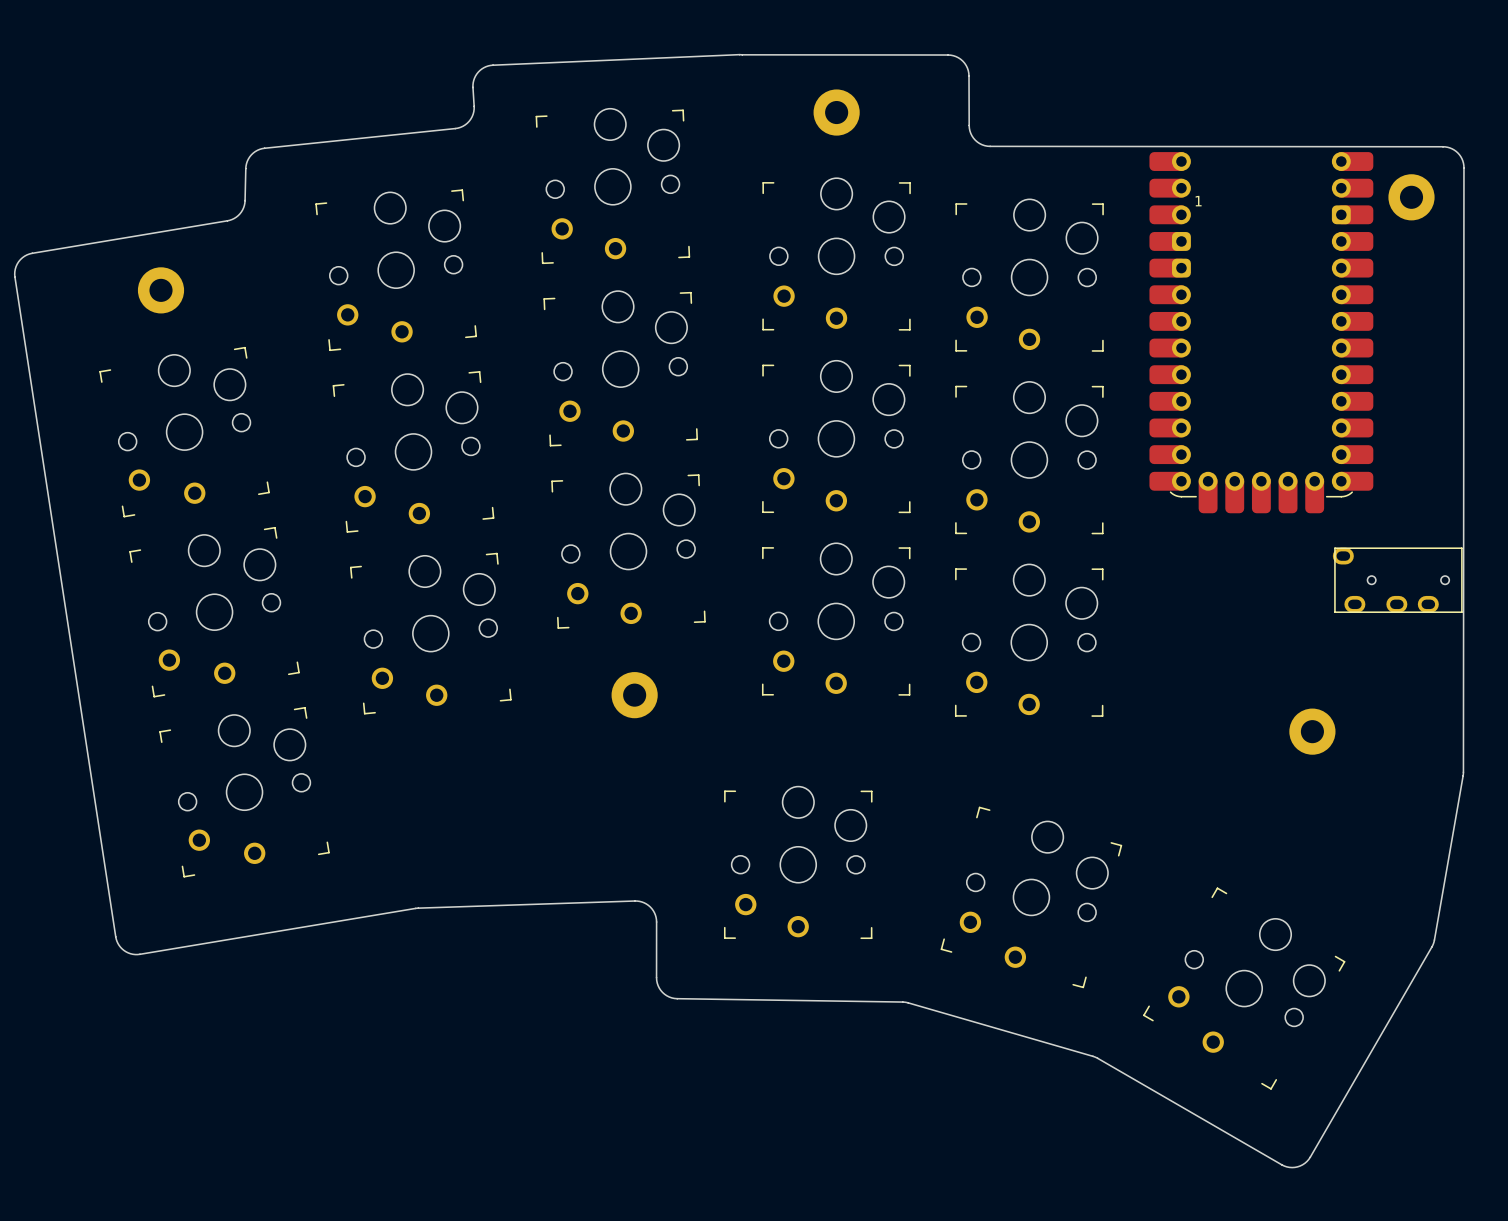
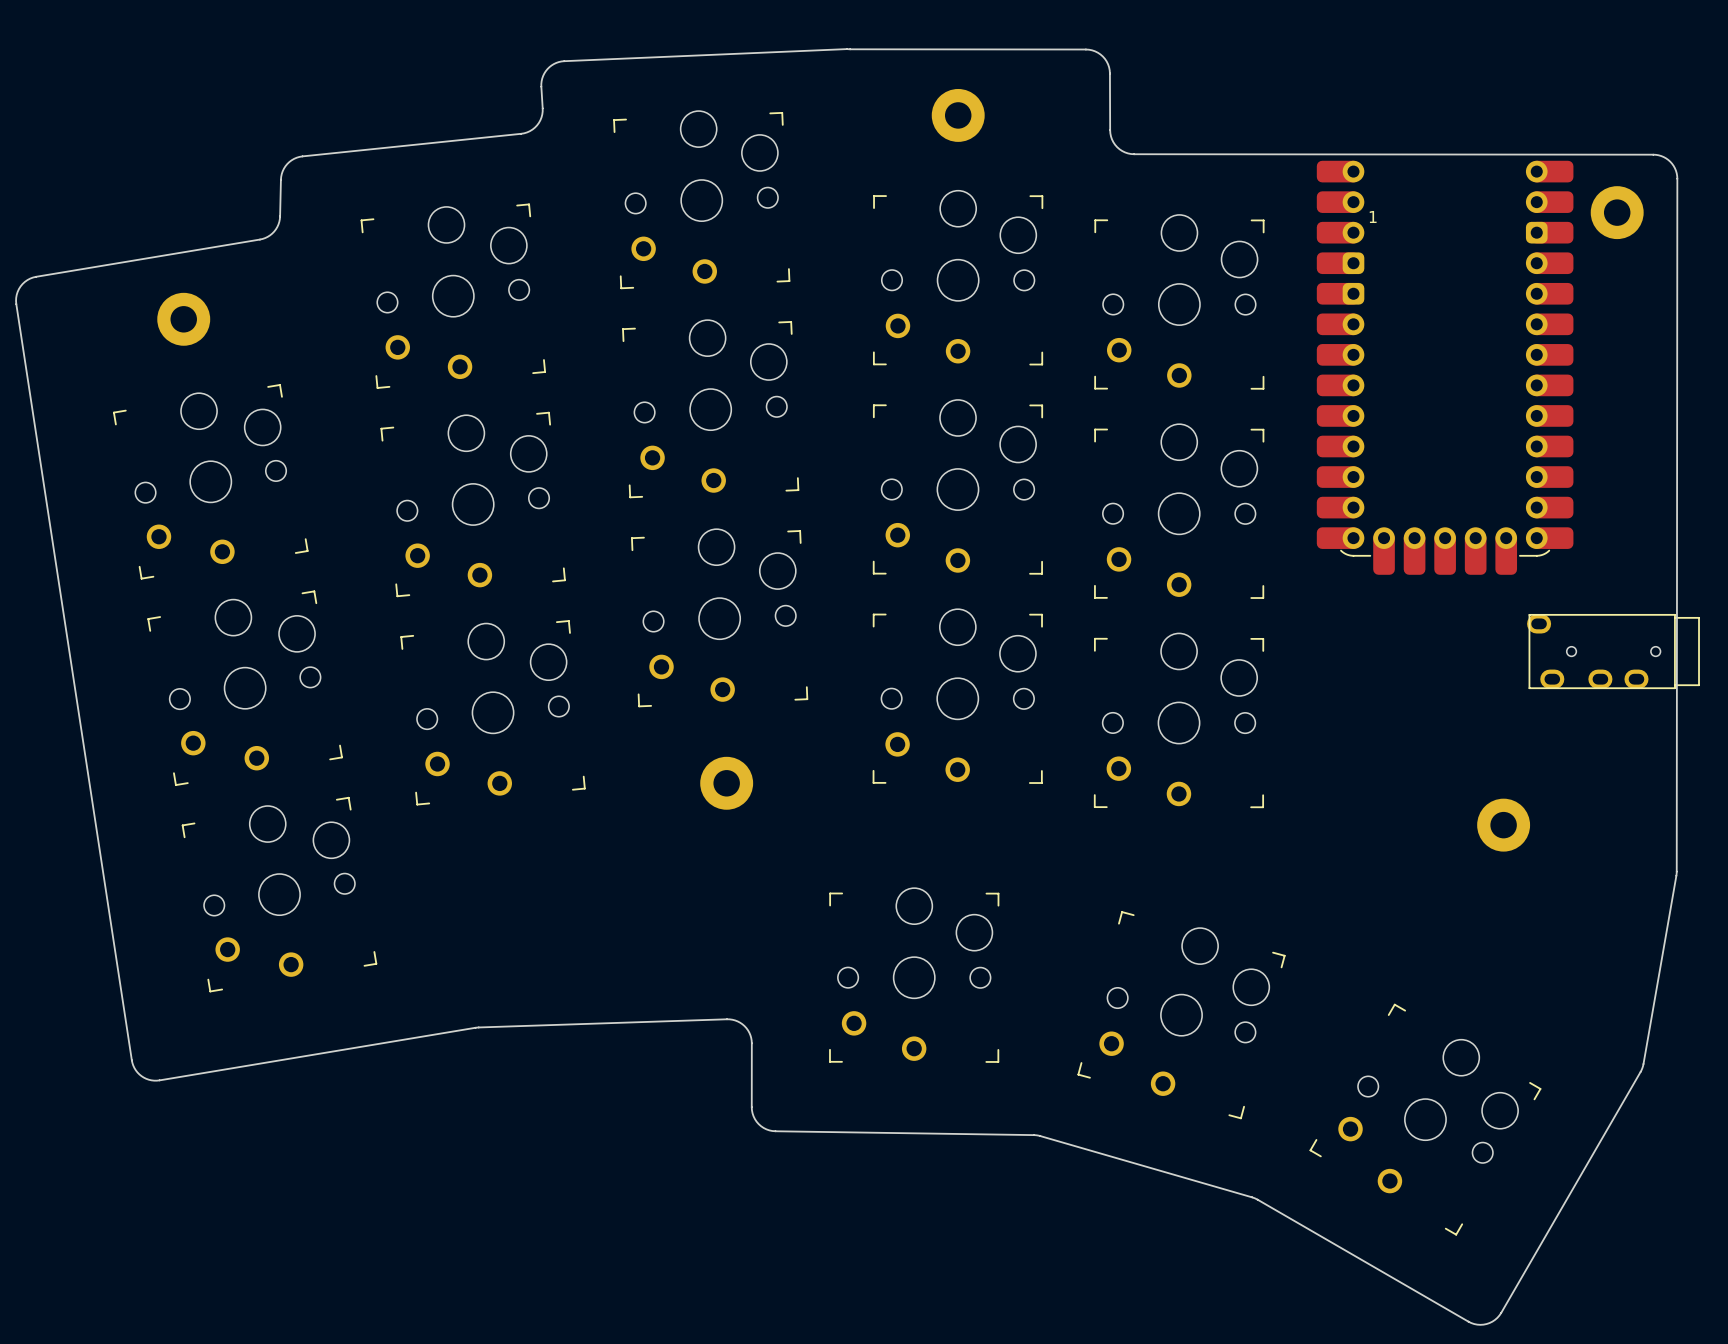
part footprint: [1332, 547, 1463, 613] -> [1527, 613, 1700, 690]

